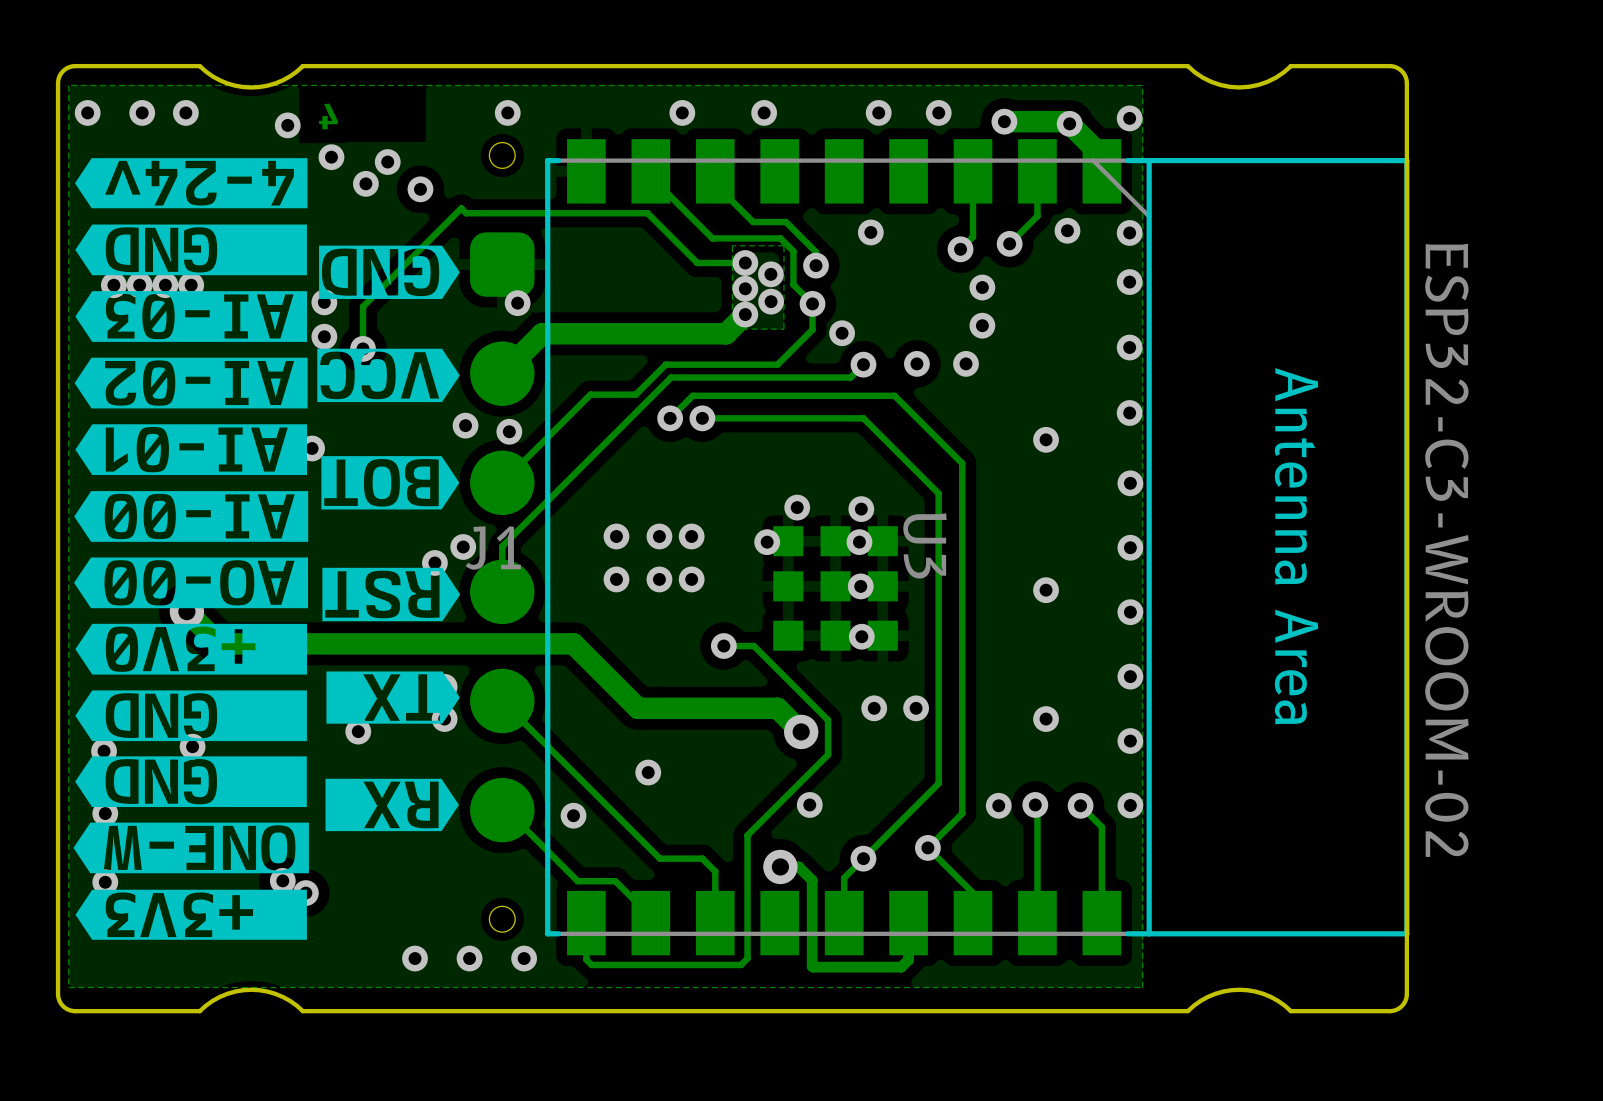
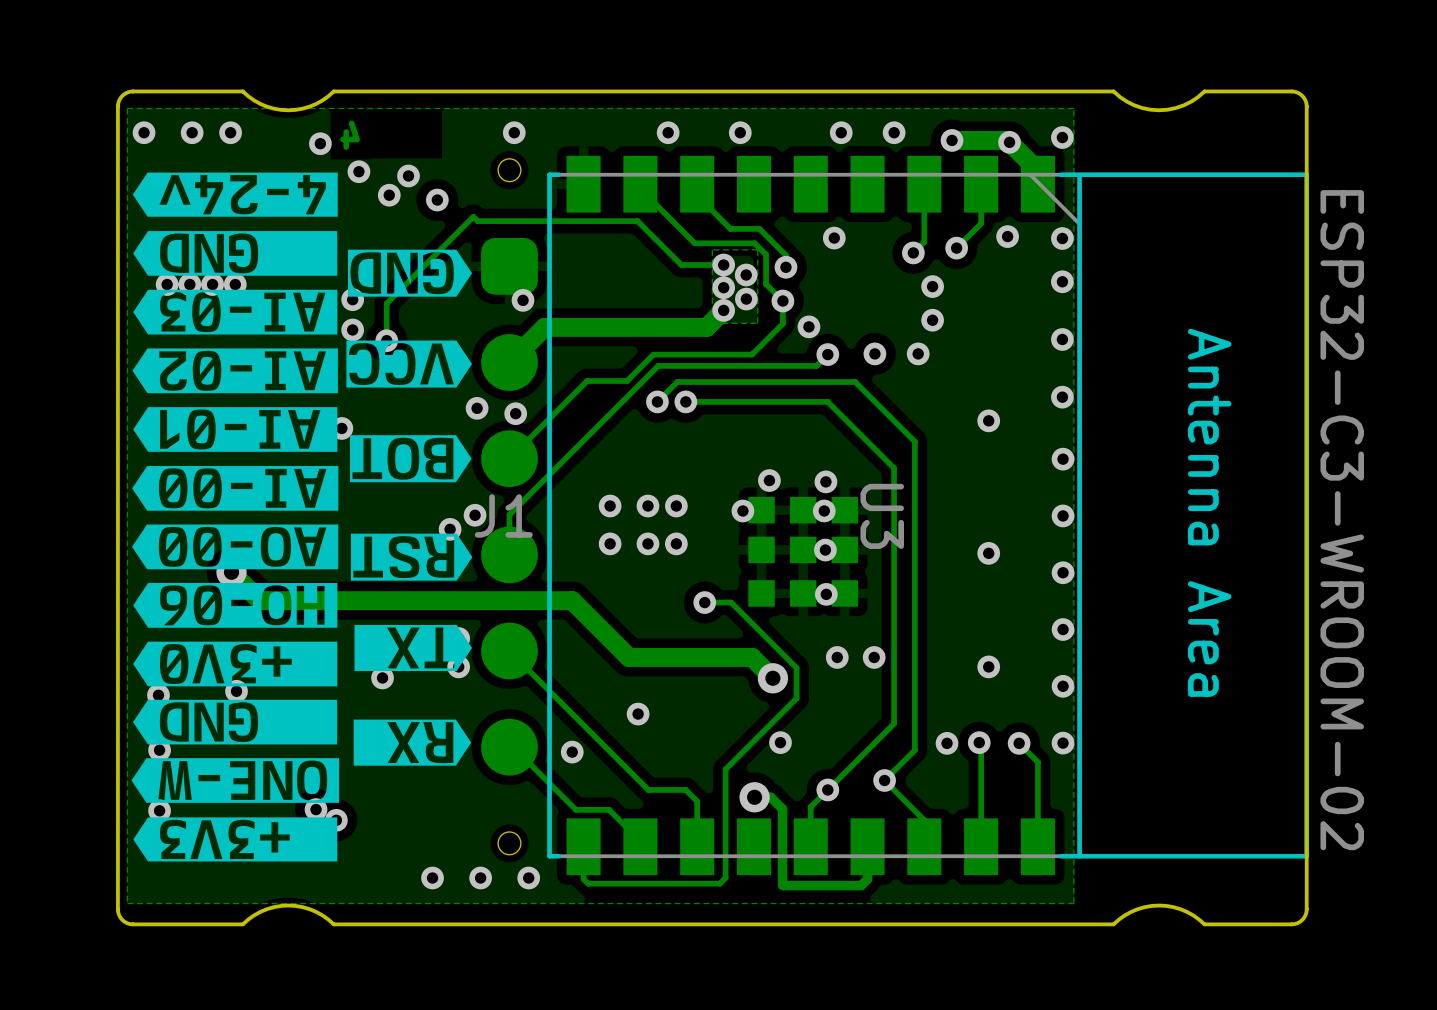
drawing: none -> [133, 582, 338, 628]
drawing position: (191, 649) -> (235, 664)
drawing: [75, 690, 307, 742] -> none

